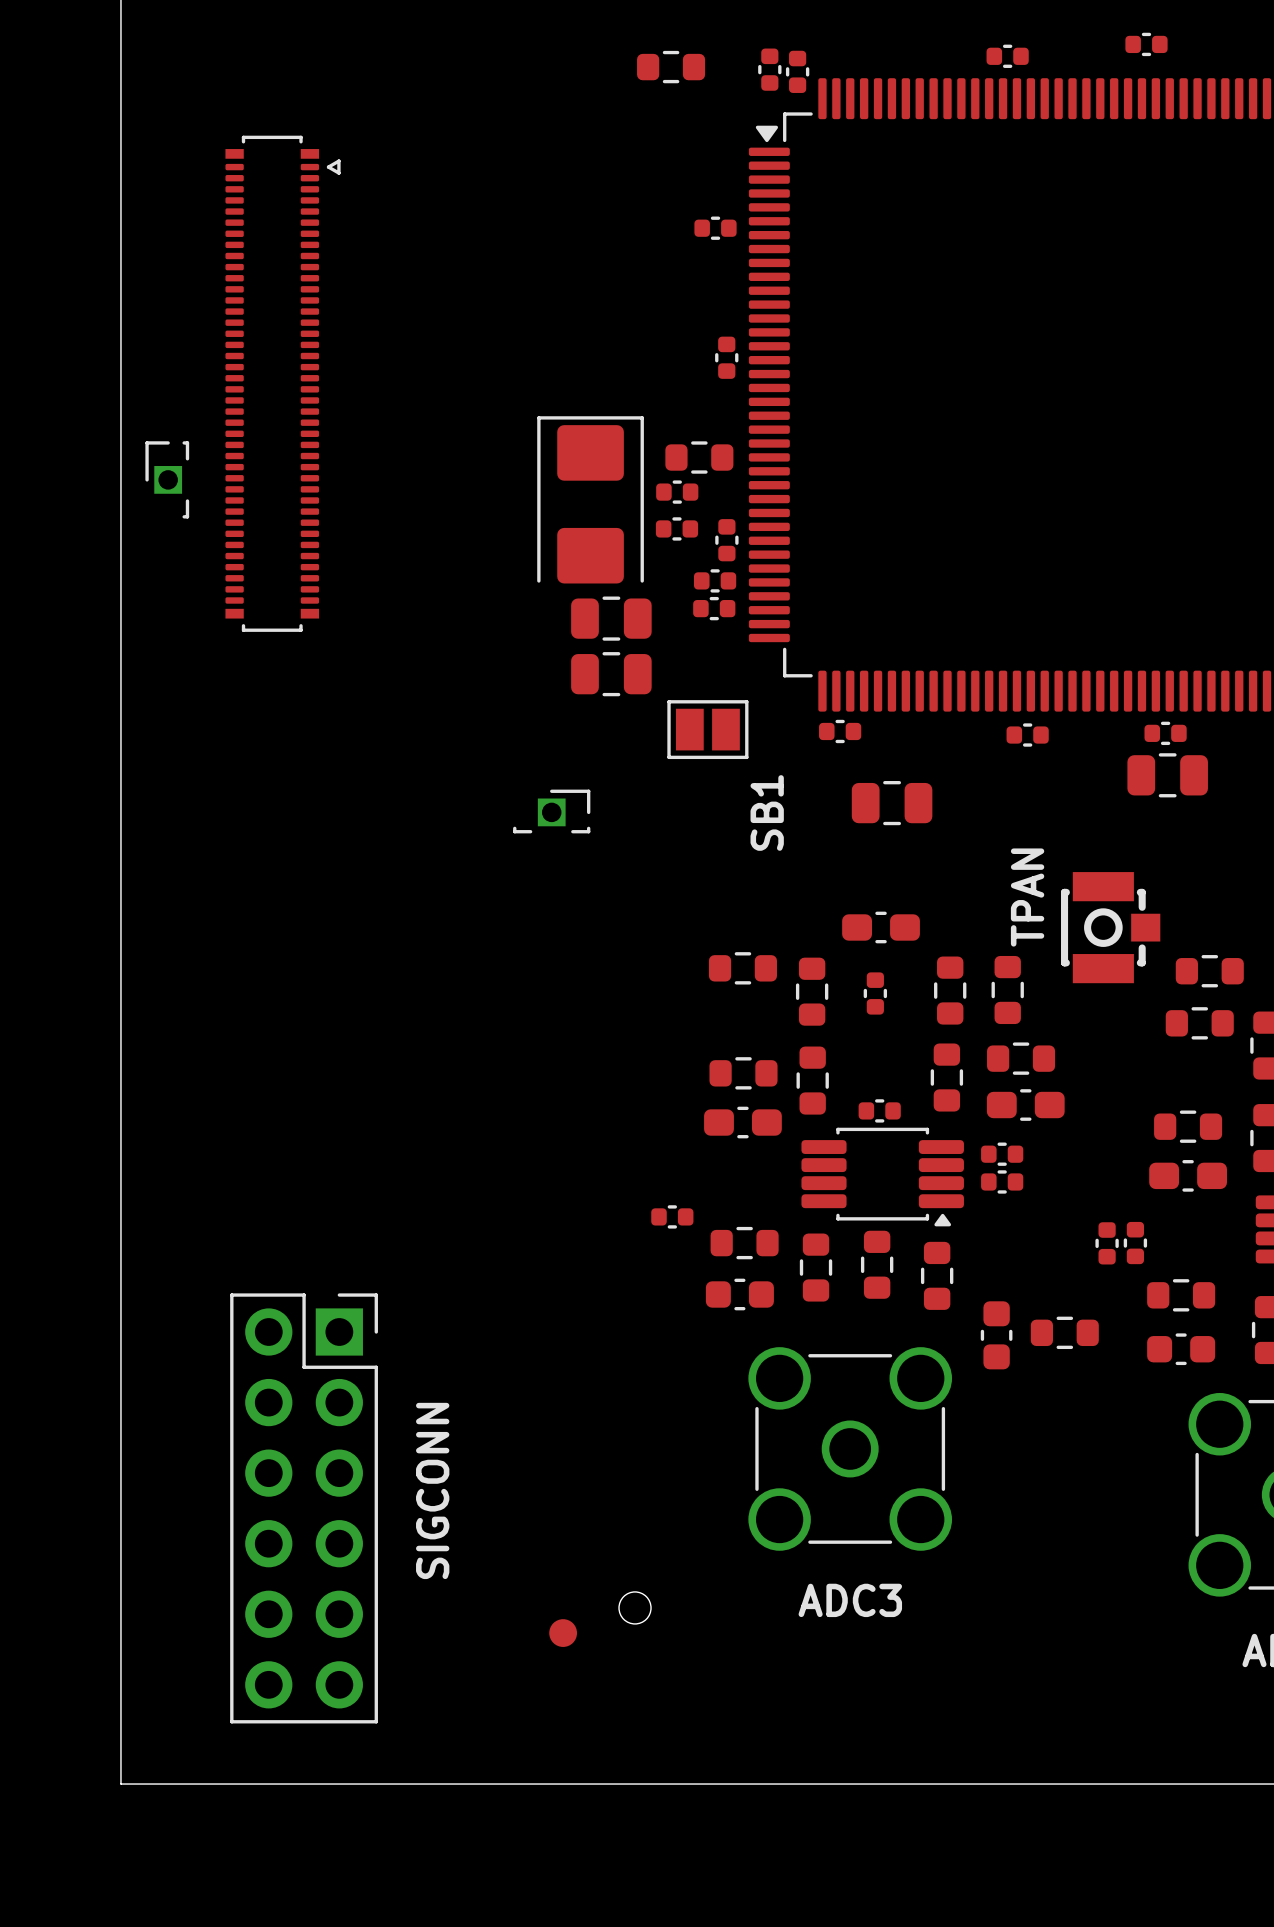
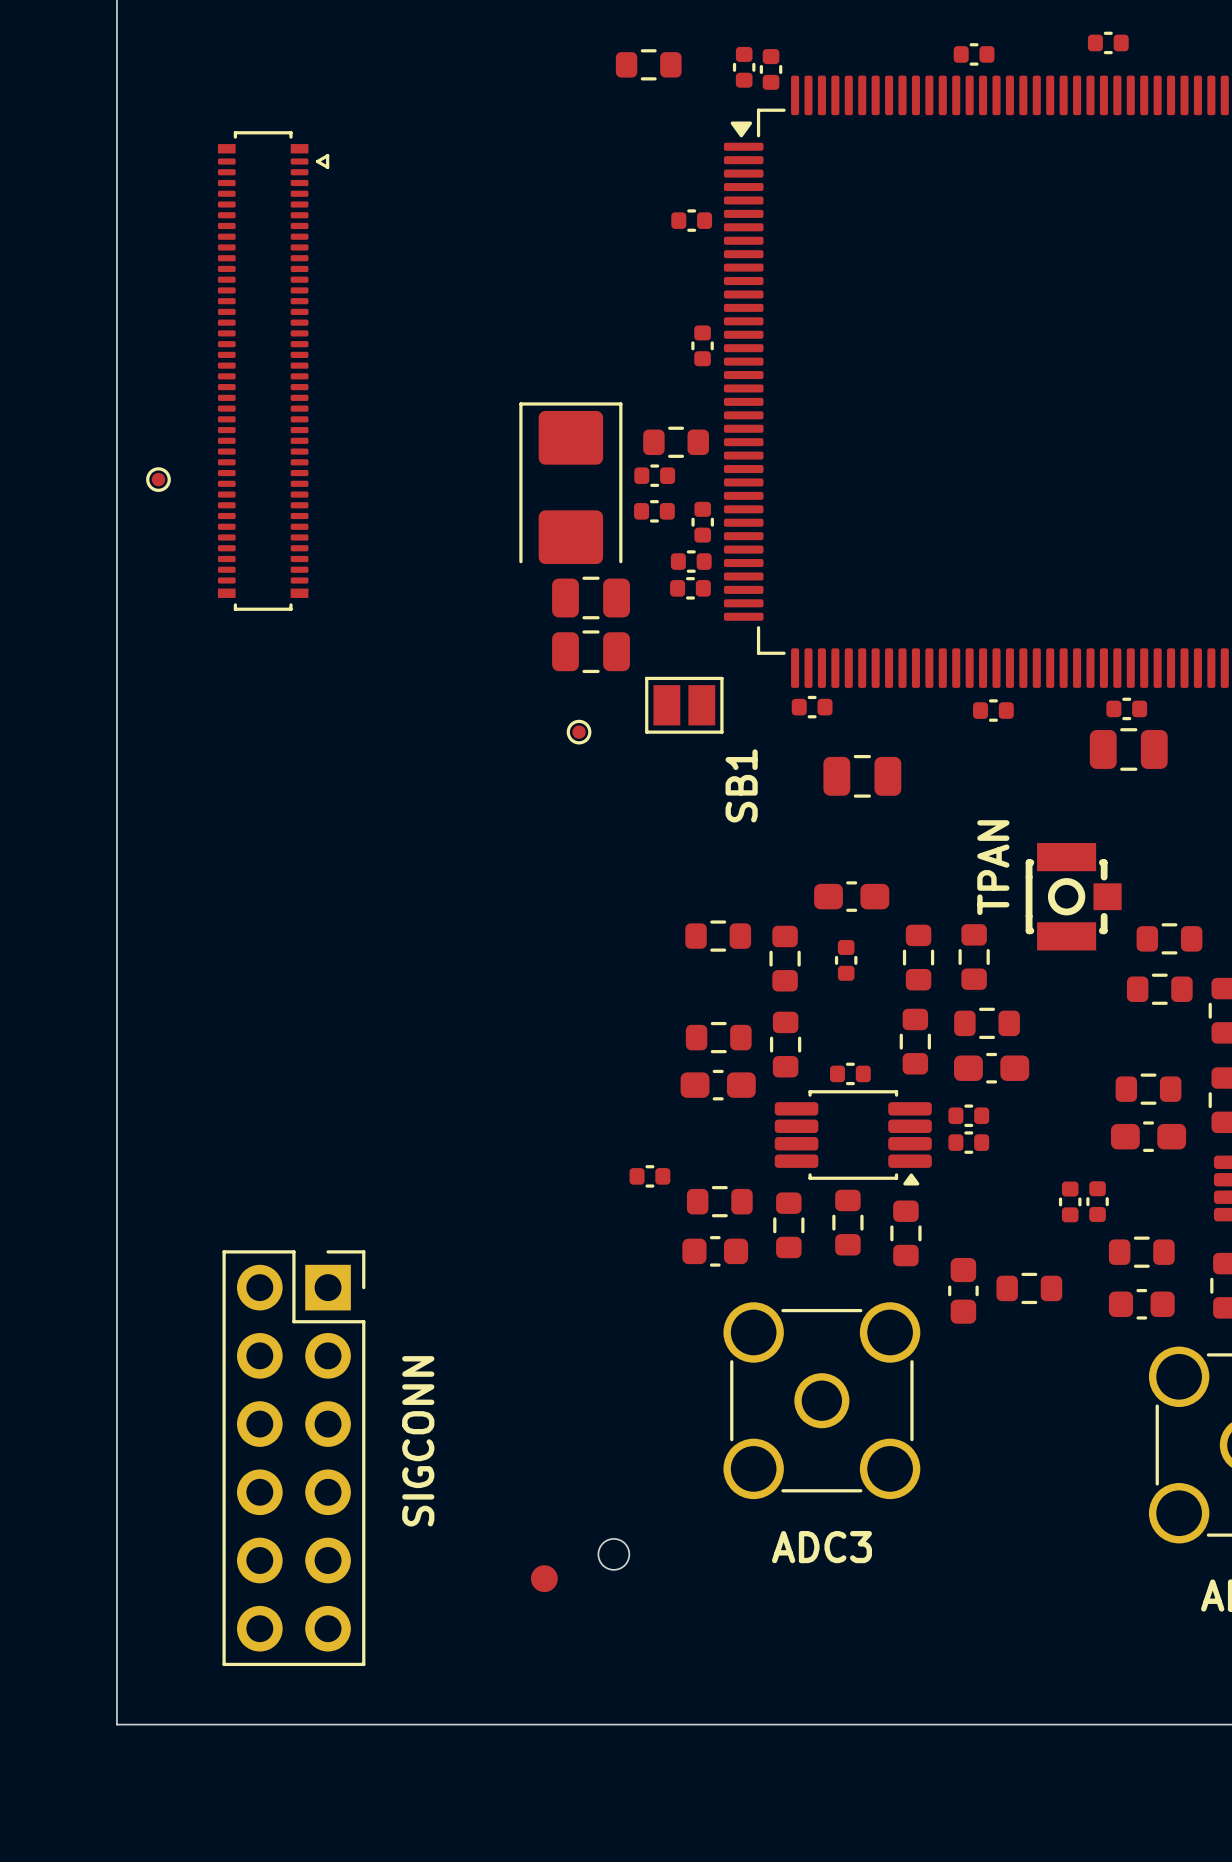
part footprint: [145, 441, 190, 519] -> [146, 467, 171, 492]
part: none -> (579, 732)
part: (551, 811) -> none

